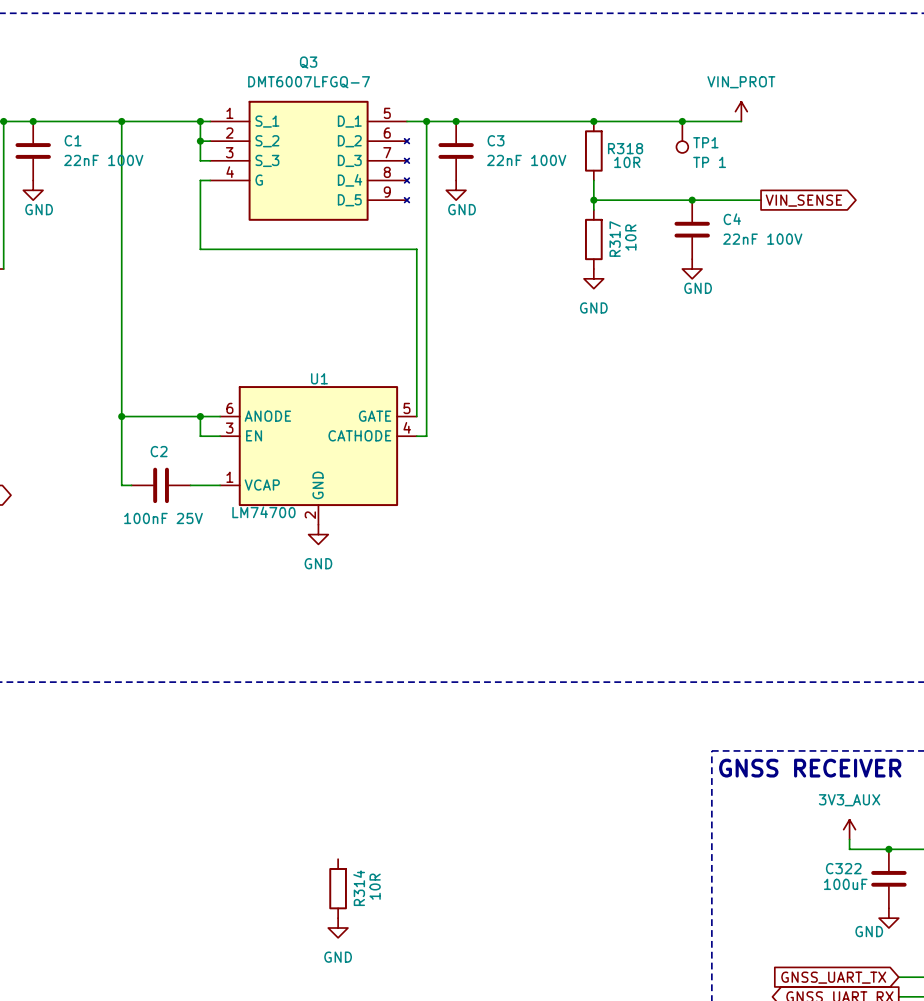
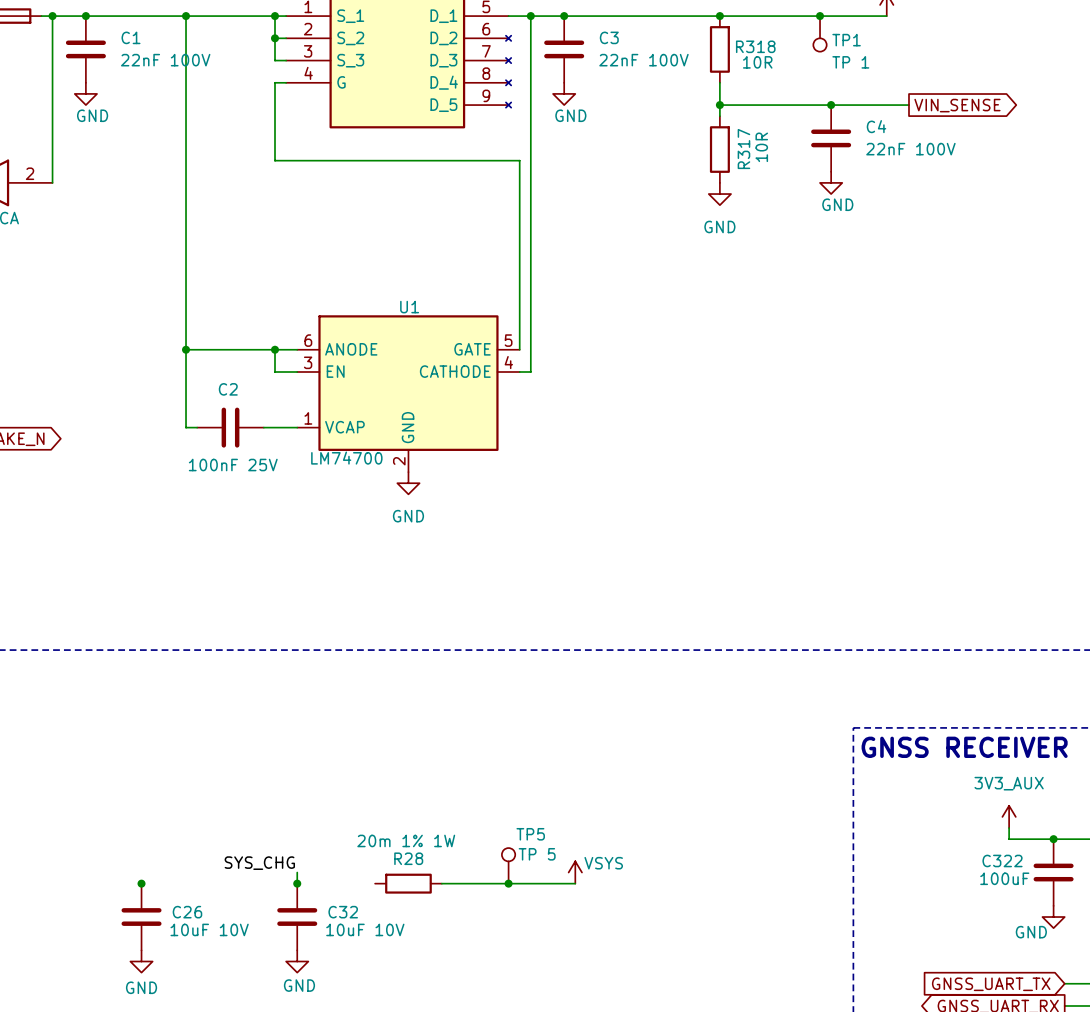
label: none -> SYS_CHG (259, 863)
TP5: none -> TP 5 (508, 865)
wire: none -> (297, 872) (297, 883)
power symbol: none -> VSYS (575, 872)
junction: none -> (141, 883)
junction: none -> (297, 883)
R28: none -> 20m 1% 1W (408, 883)
R314: 10R (338, 888) -> none
wire: none -> (441, 883) (575, 883)
junction: none -> (508, 883)
C26: none -> 10uF 10V (141, 917)
C32: none -> 10uF 10V (297, 917)
power symbol: GND (338, 928) -> none
power symbol: none -> GND (141, 961)
power symbol: none -> GND (297, 961)

